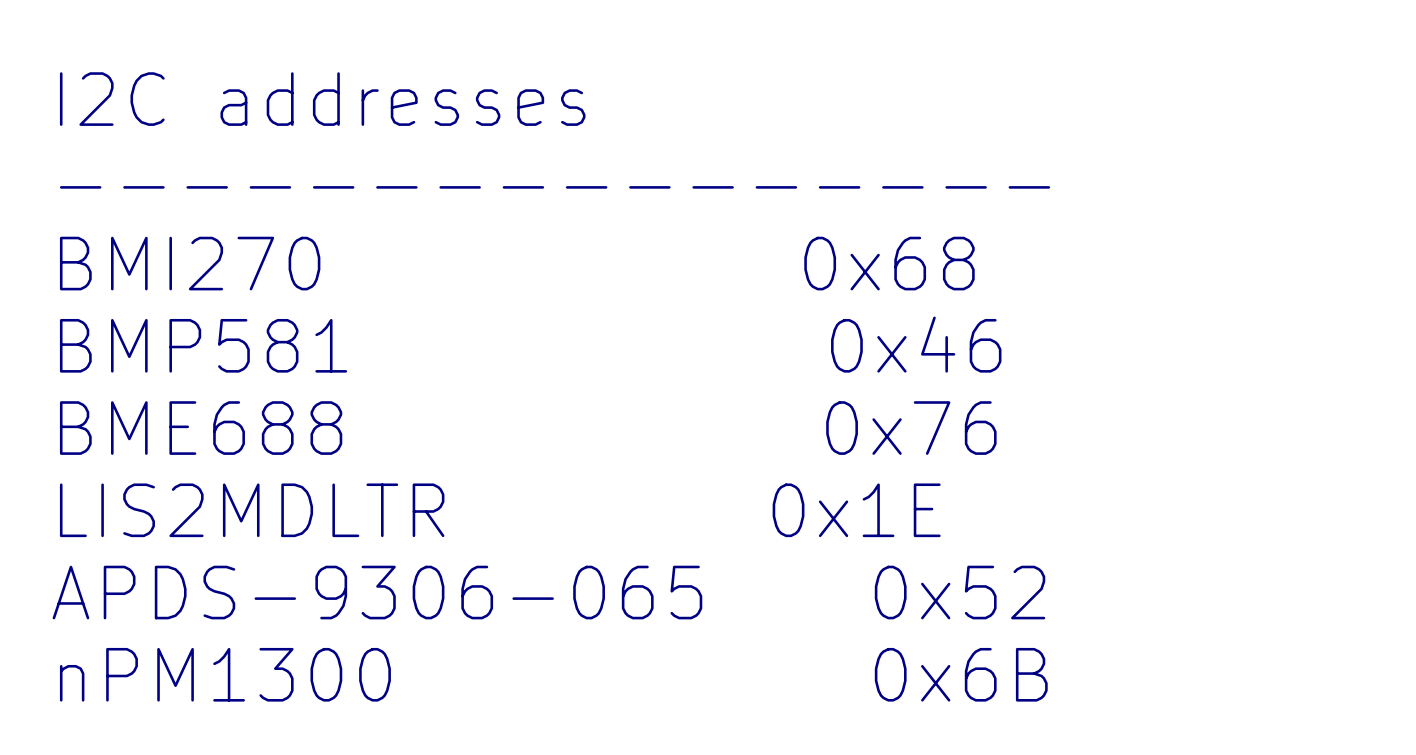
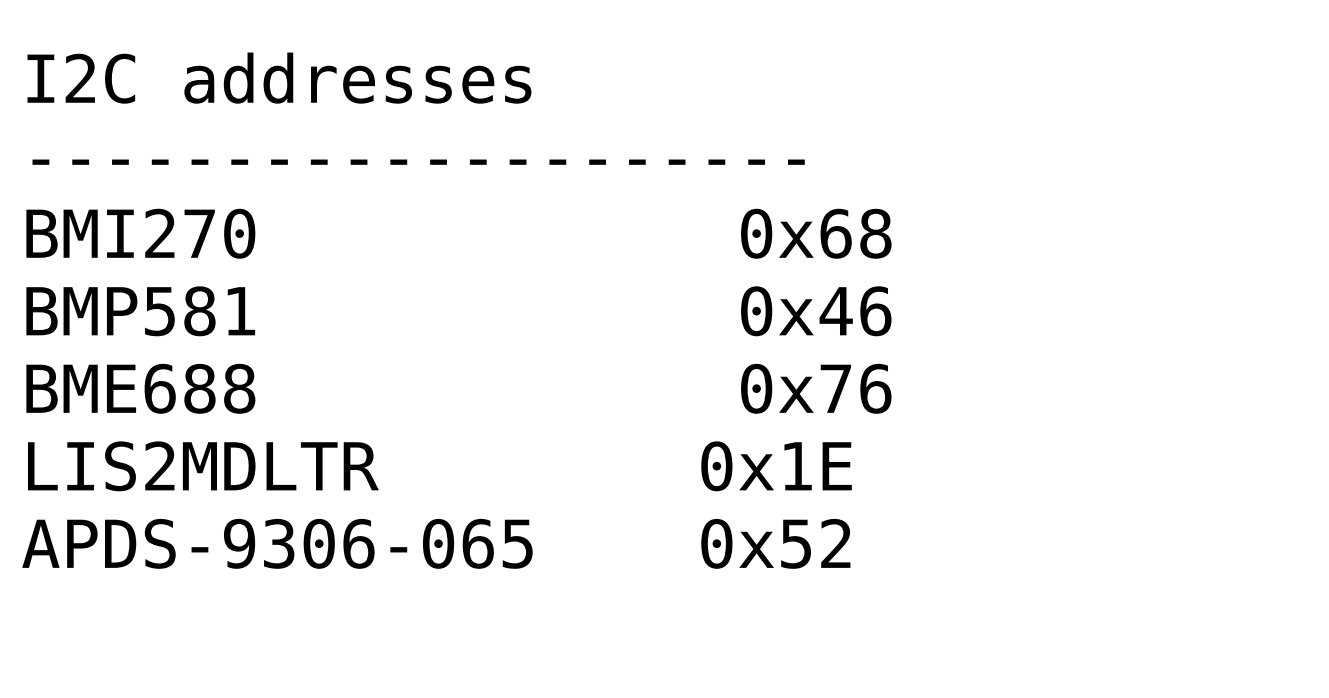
text: ---------------- (555, 187) -> -------------------- (418, 162)
text: nPM1300 0x6B (553, 674) -> none

